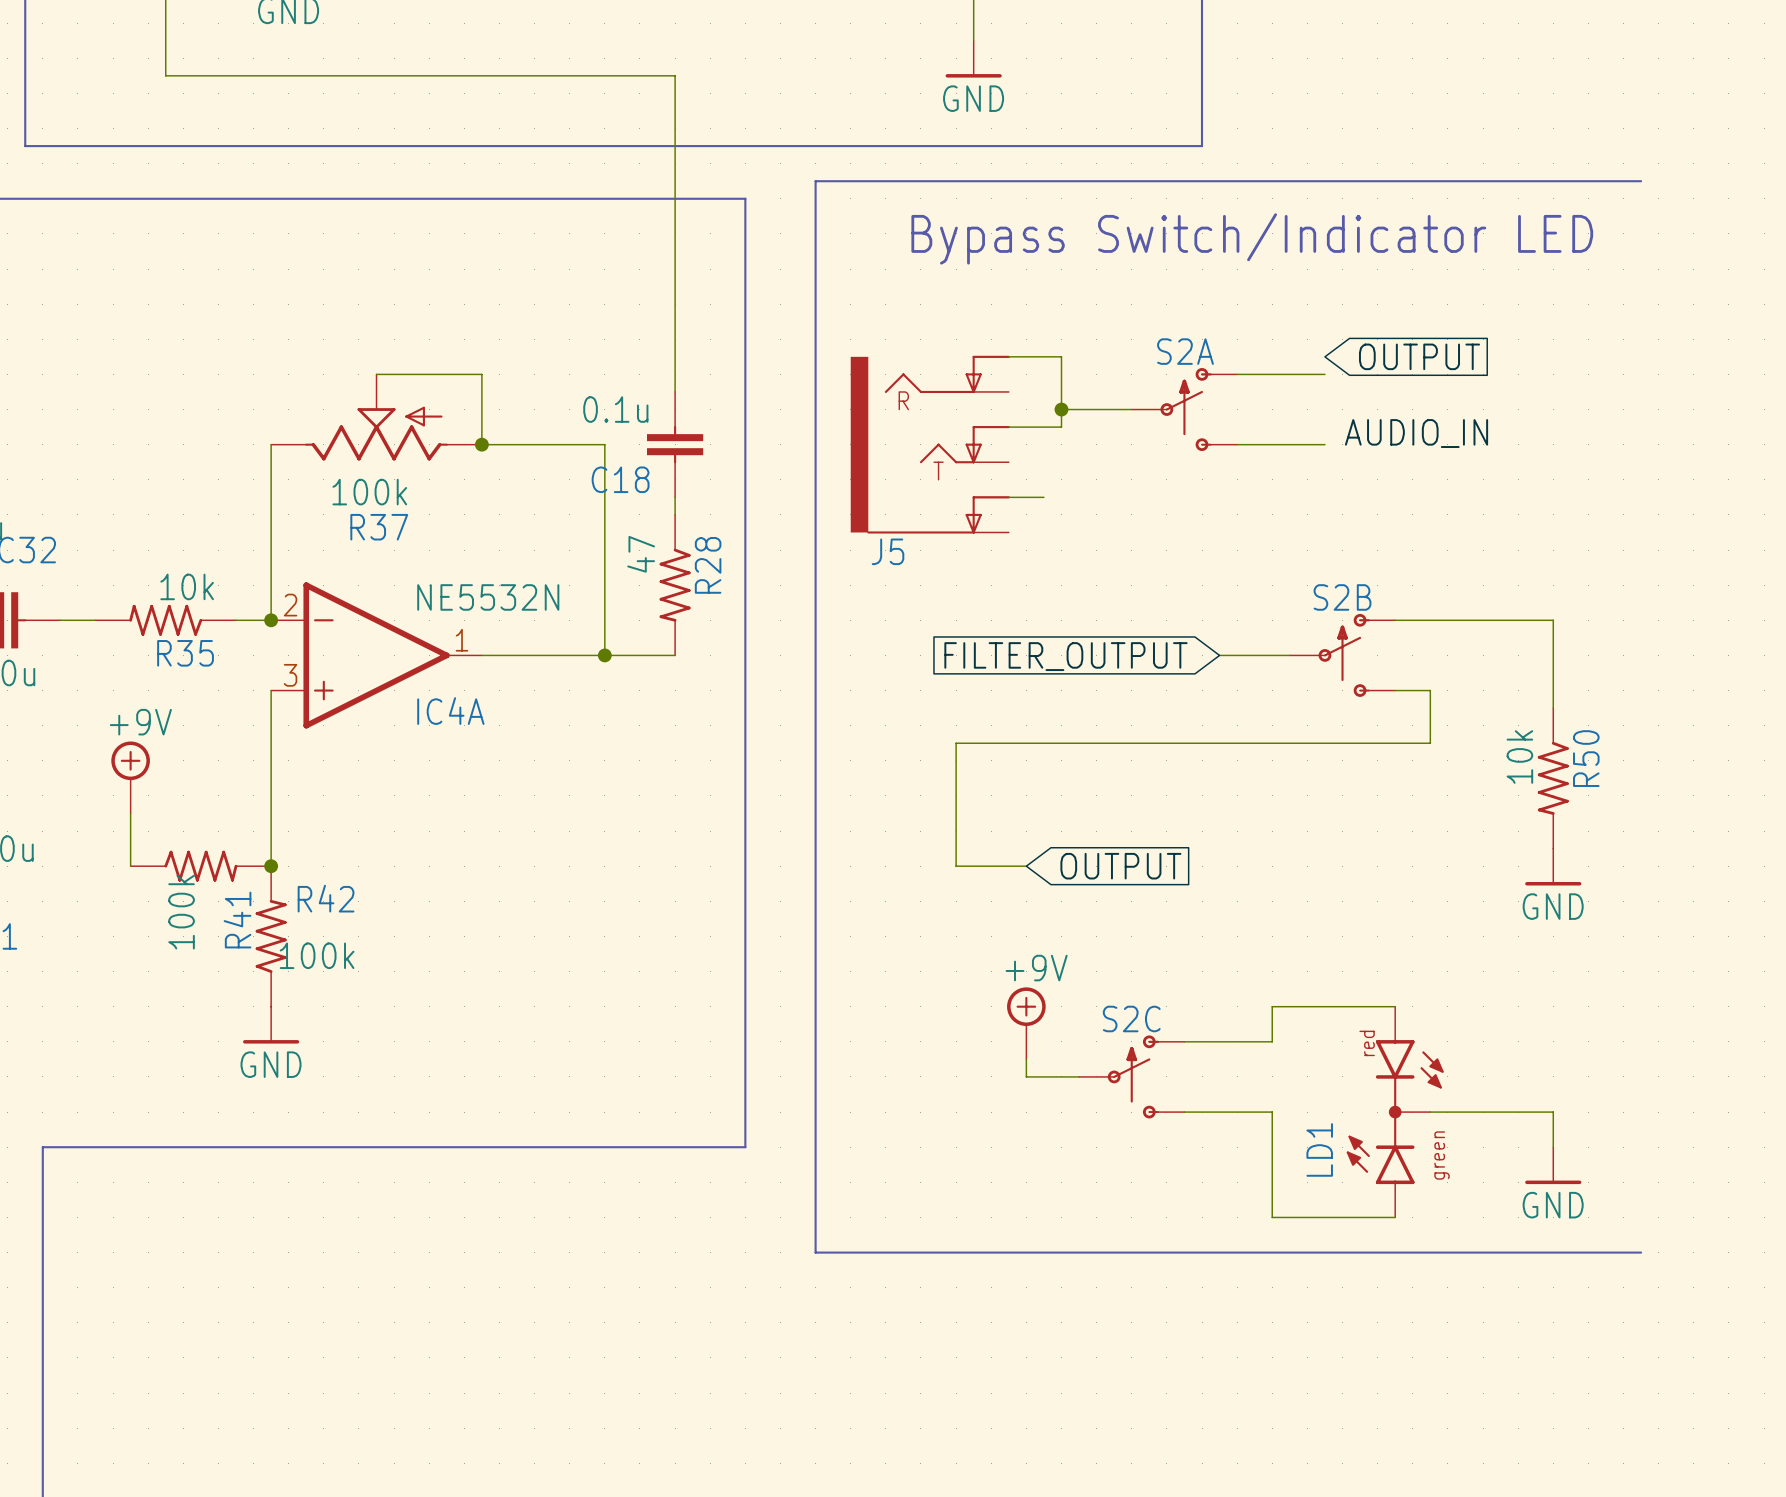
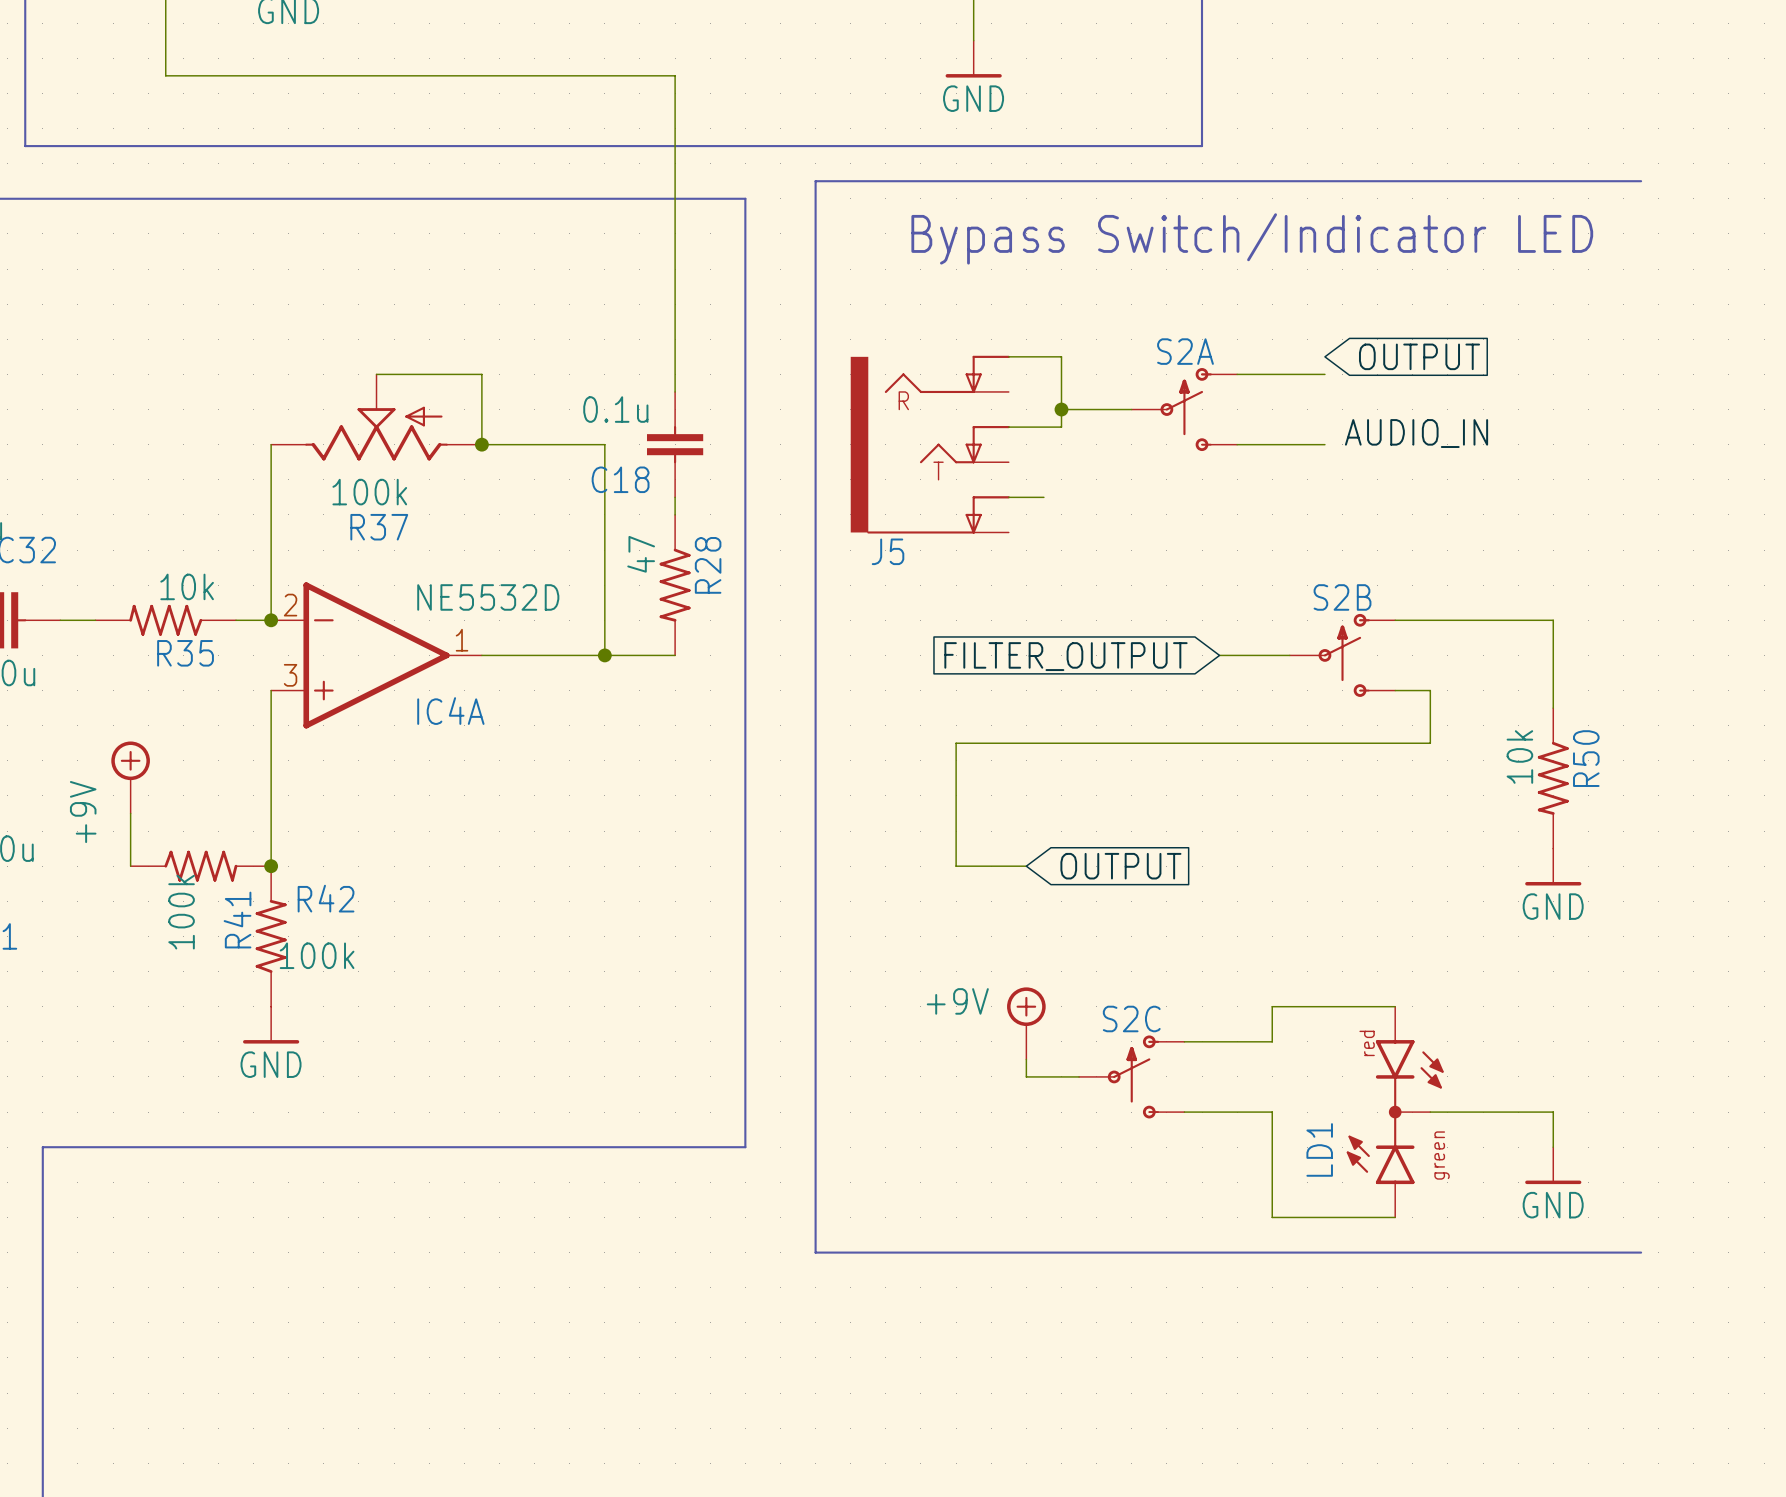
IC4A value: NE5532N (488, 597) -> NE5532D (488, 597)
power symbol text rotation: 0° (140, 722) -> 90° counterclockwise (83, 812)
power symbol text position: +9V (140, 722) -> +9V (83, 812)
power symbol text position: +9V (1036, 968) -> +9V (957, 1001)

